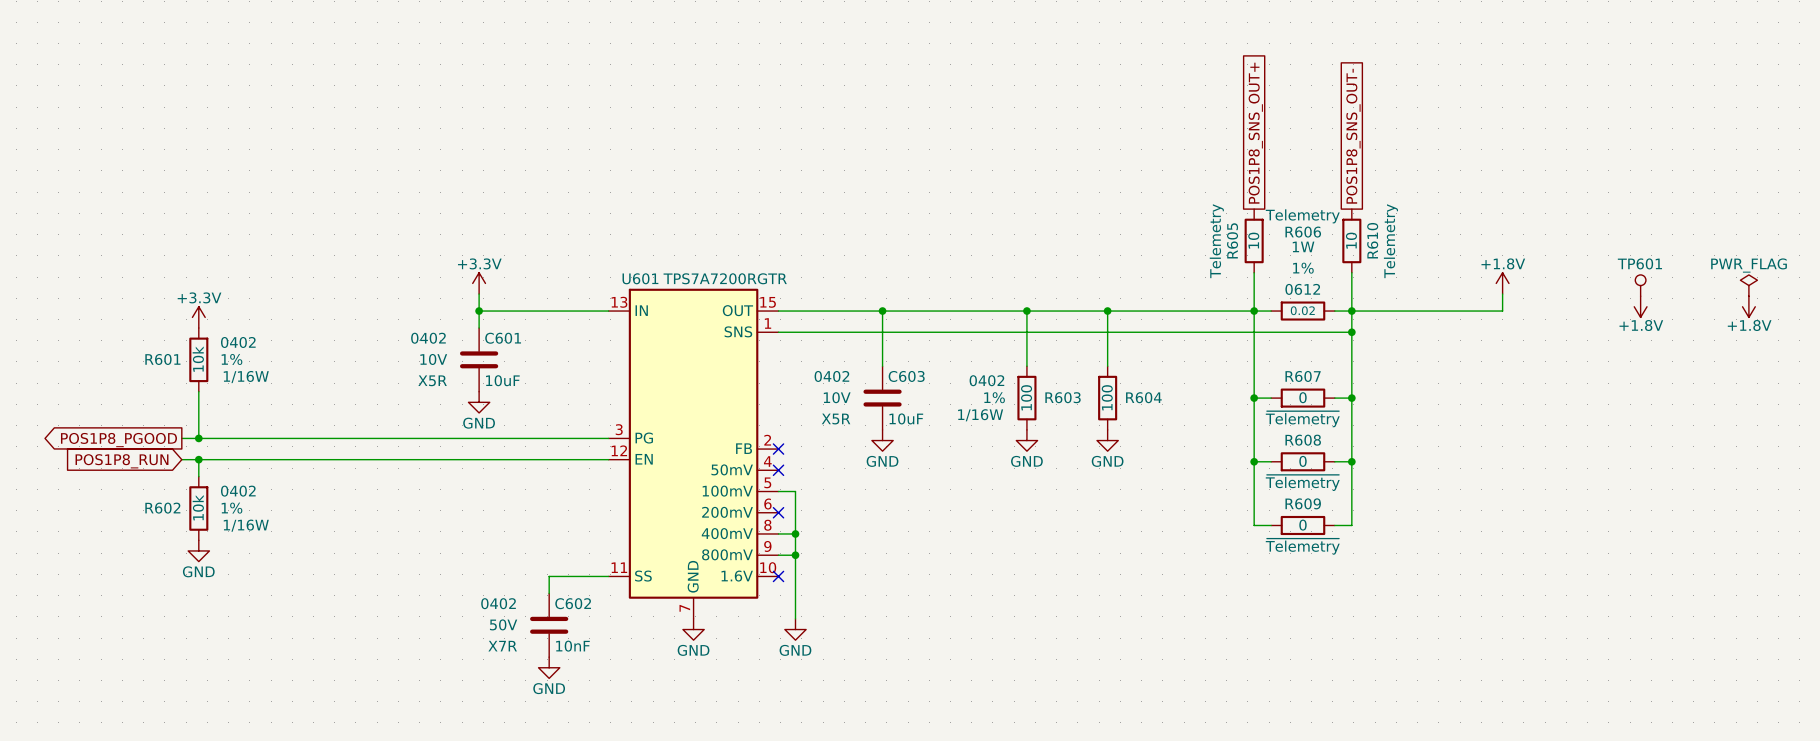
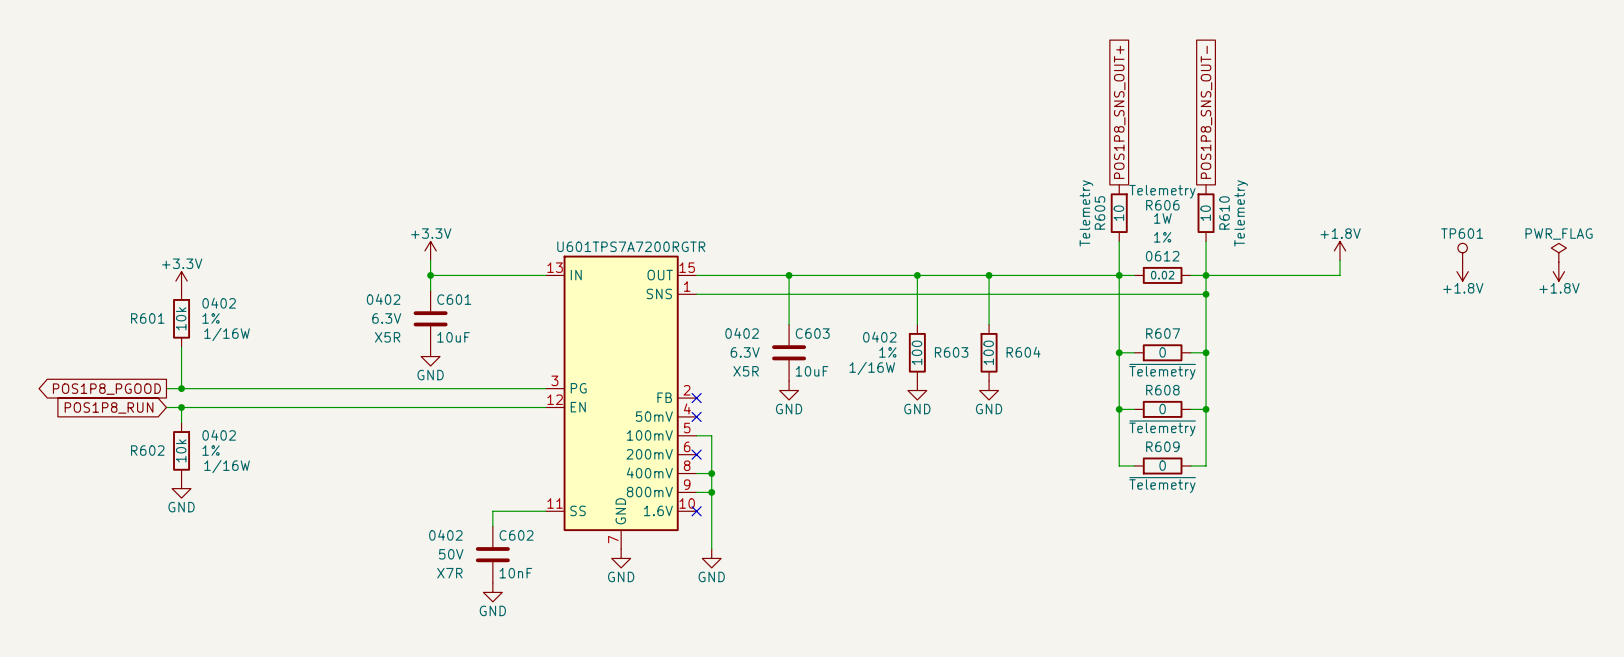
C601 text: 10V (433, 359) -> 6.3V (386, 318)
C603 text: 10V (837, 397) -> 6.3V (745, 352)

